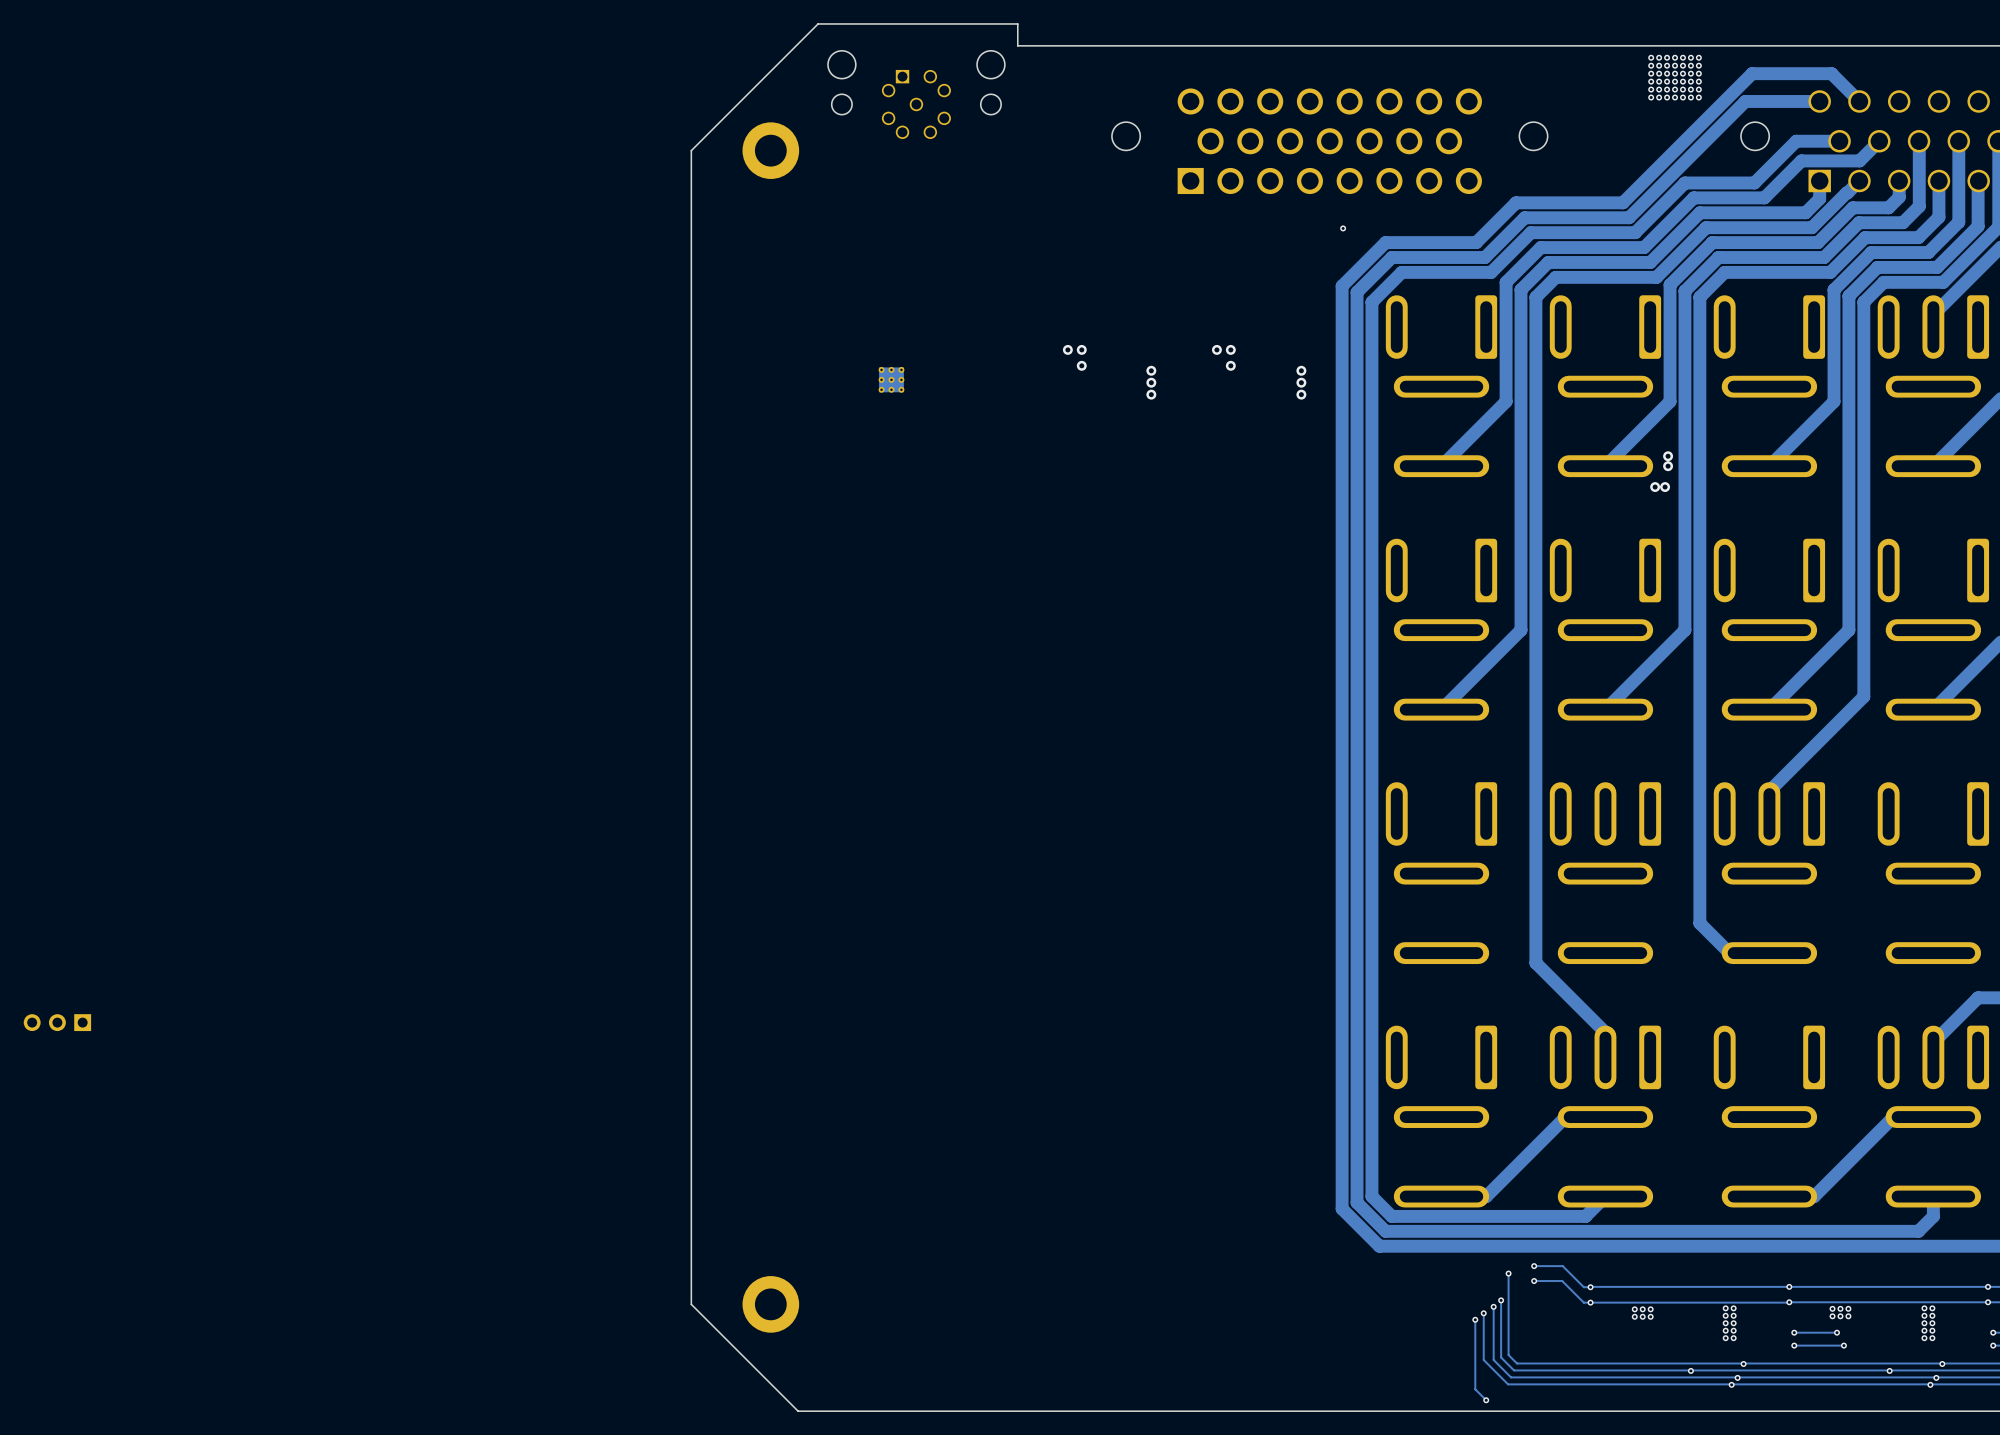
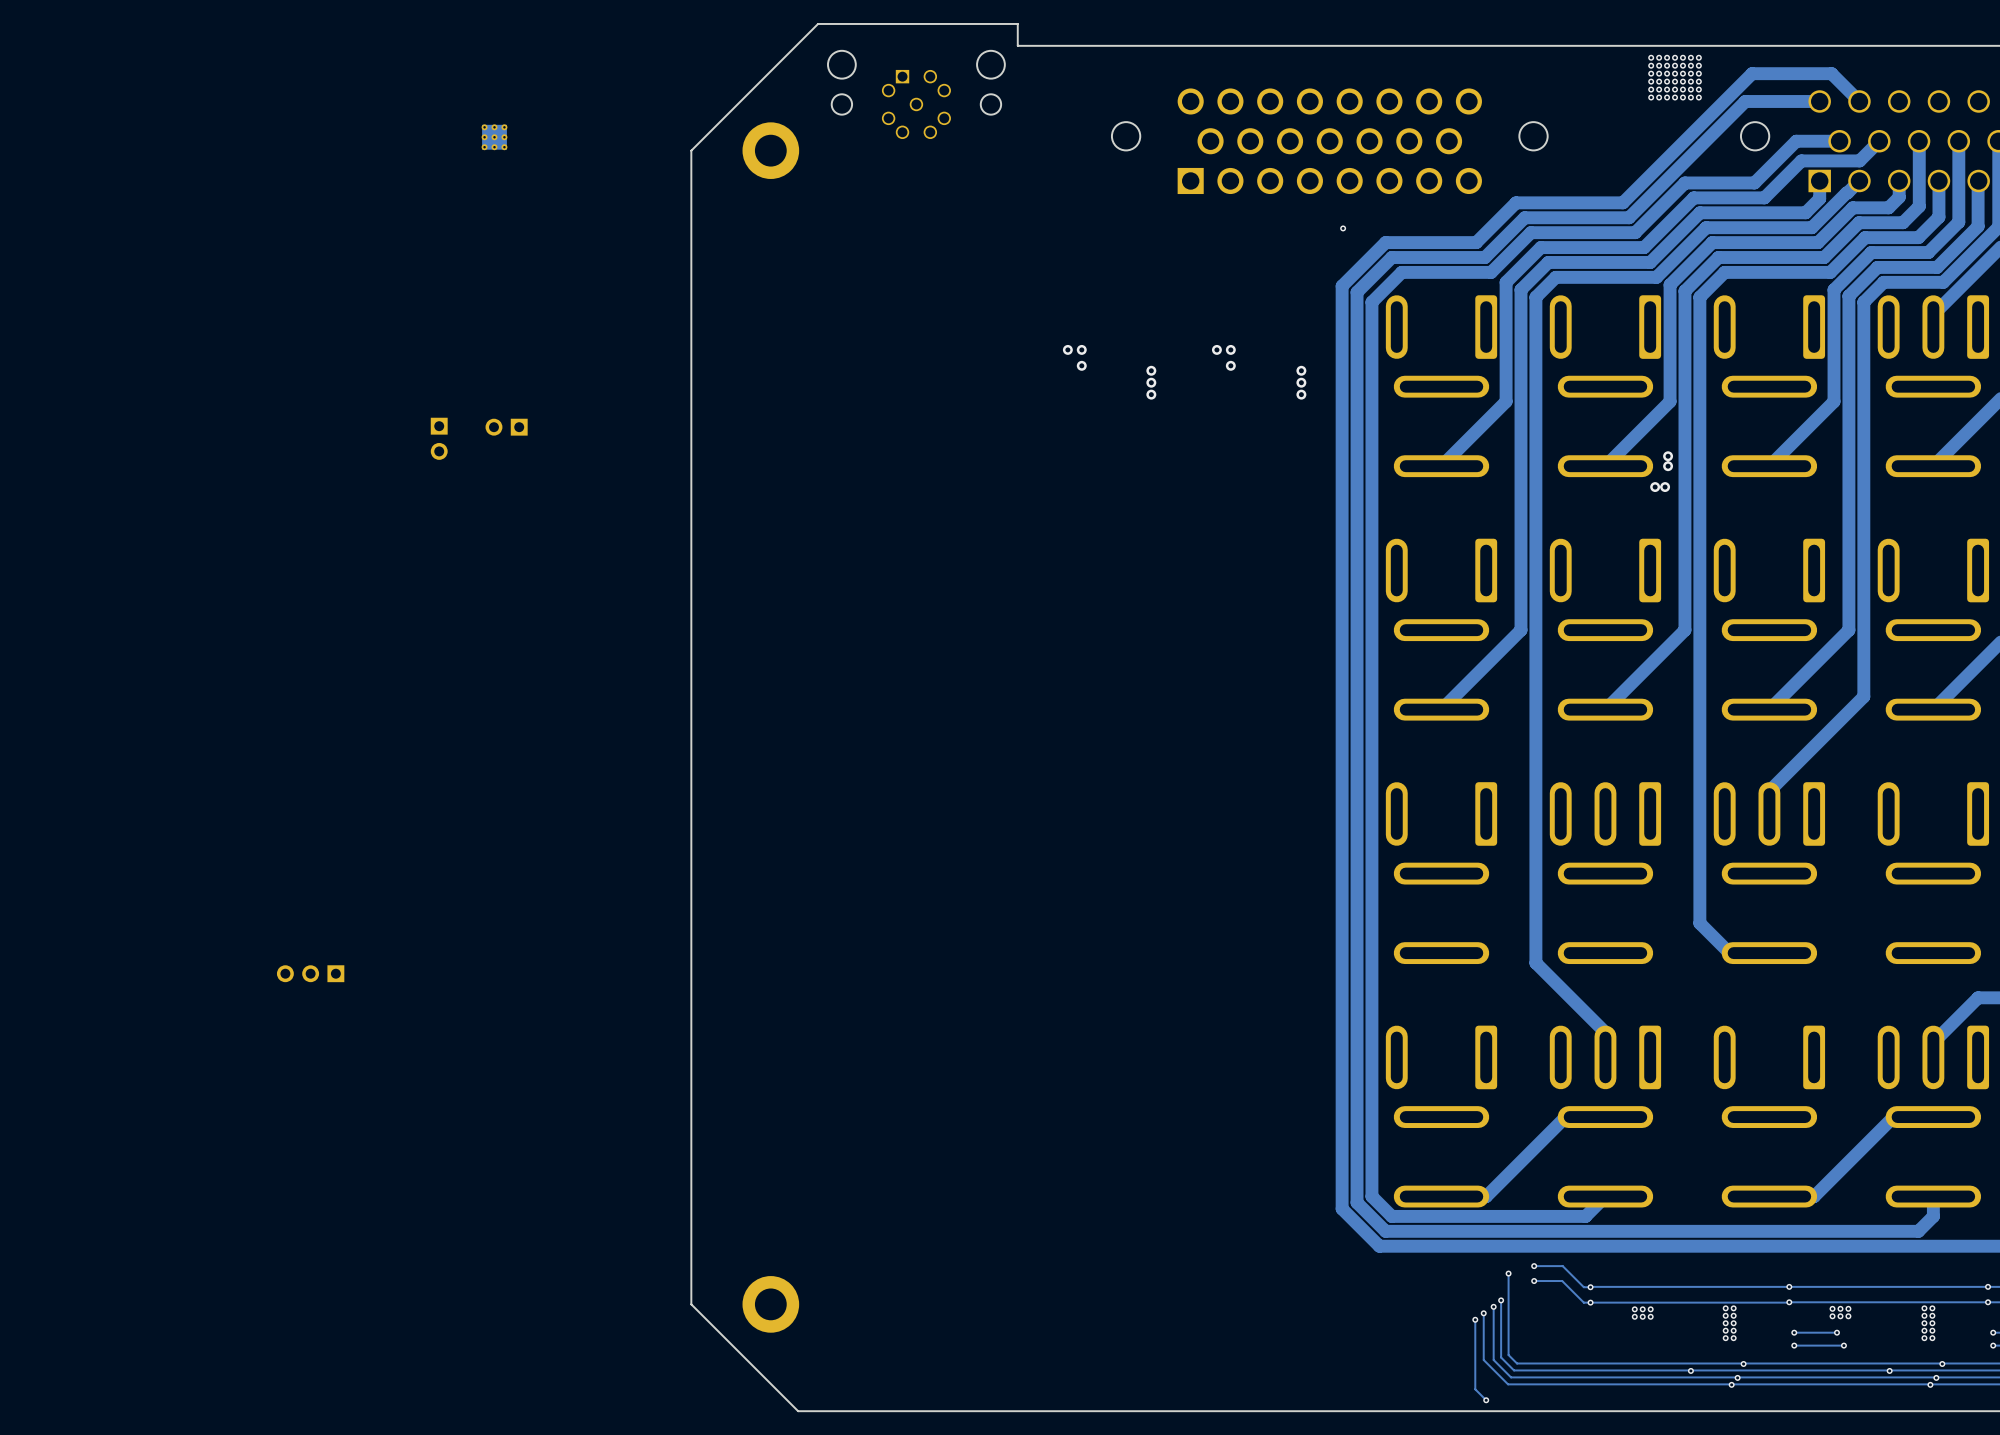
part: none -> (494, 137)
part: (891, 379) -> none
part: none -> (506, 427)
part: none -> (439, 438)
part: none -> (310, 973)
part: (57, 1022) -> none

